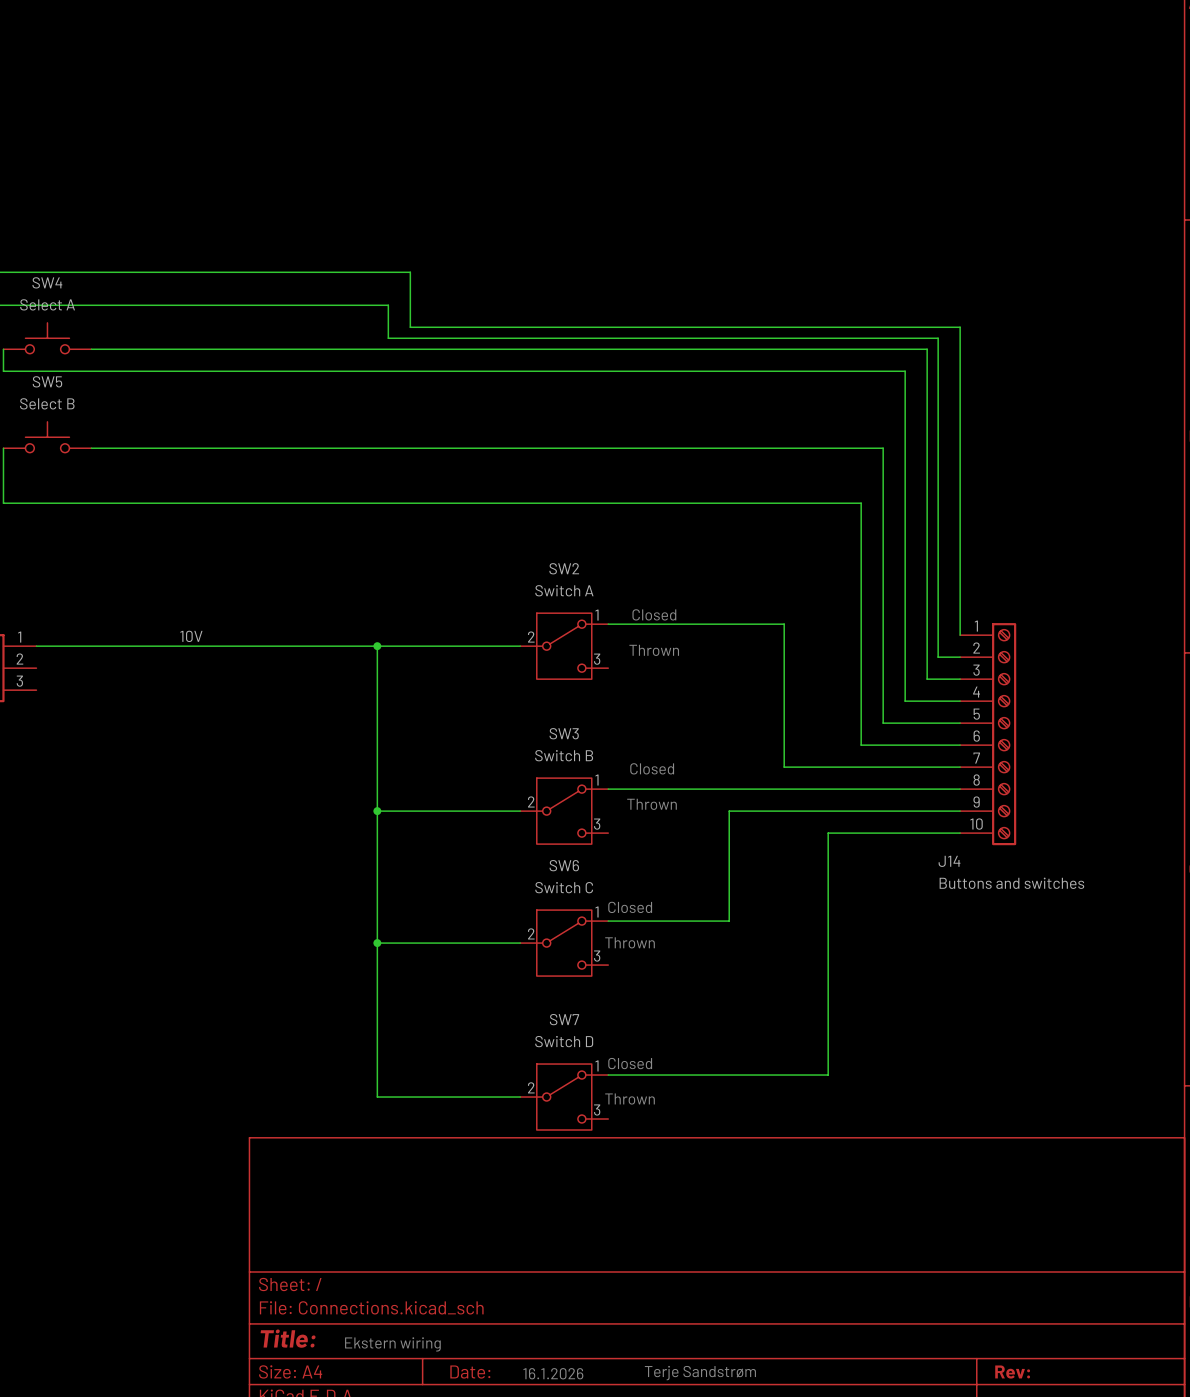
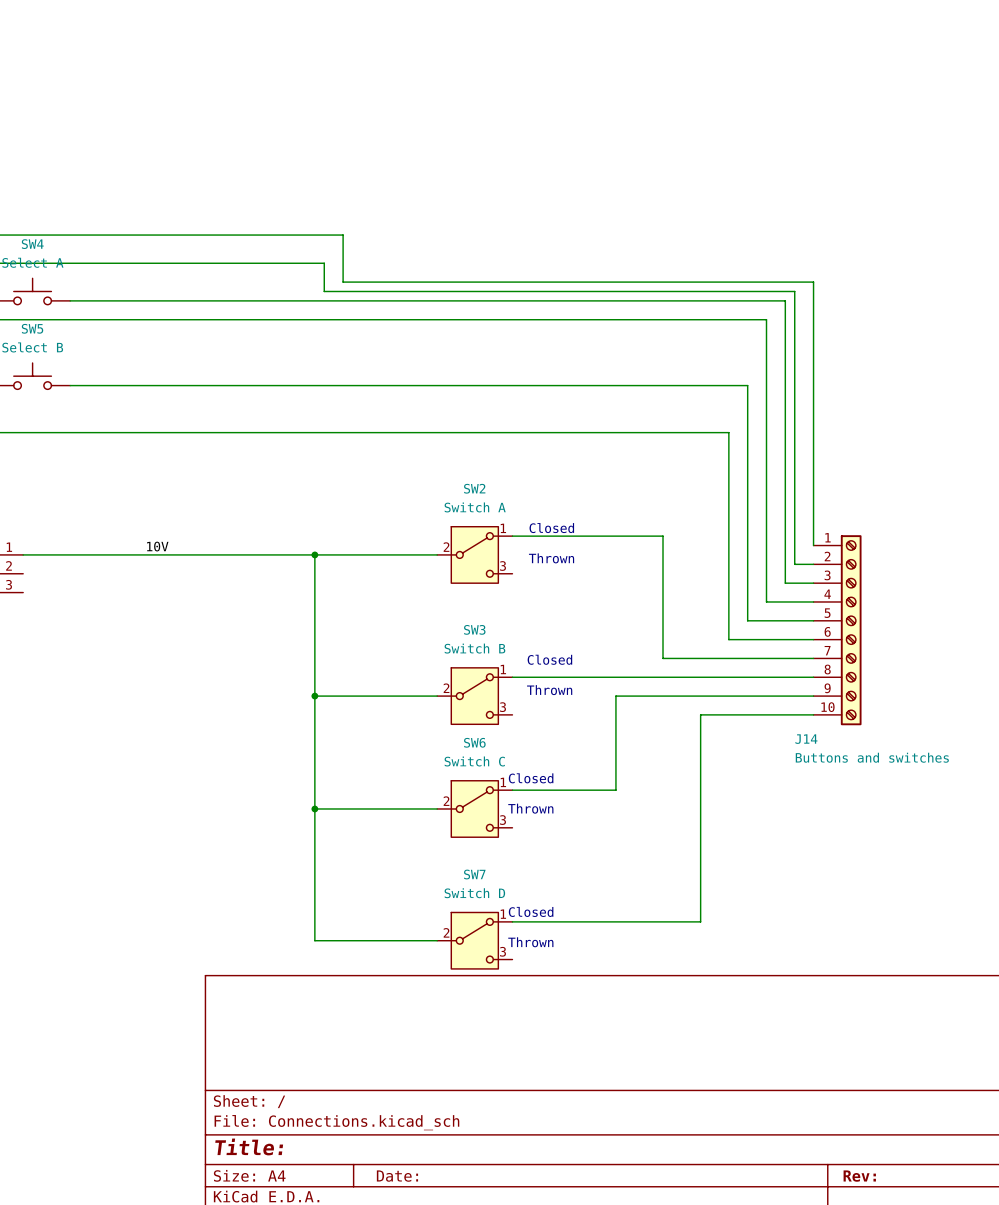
text: Ekstern wiring (392, 1344) -> none
text: 16.1.2026 (553, 1373) -> none
text: Terje Sandstrøm (700, 1373) -> none

